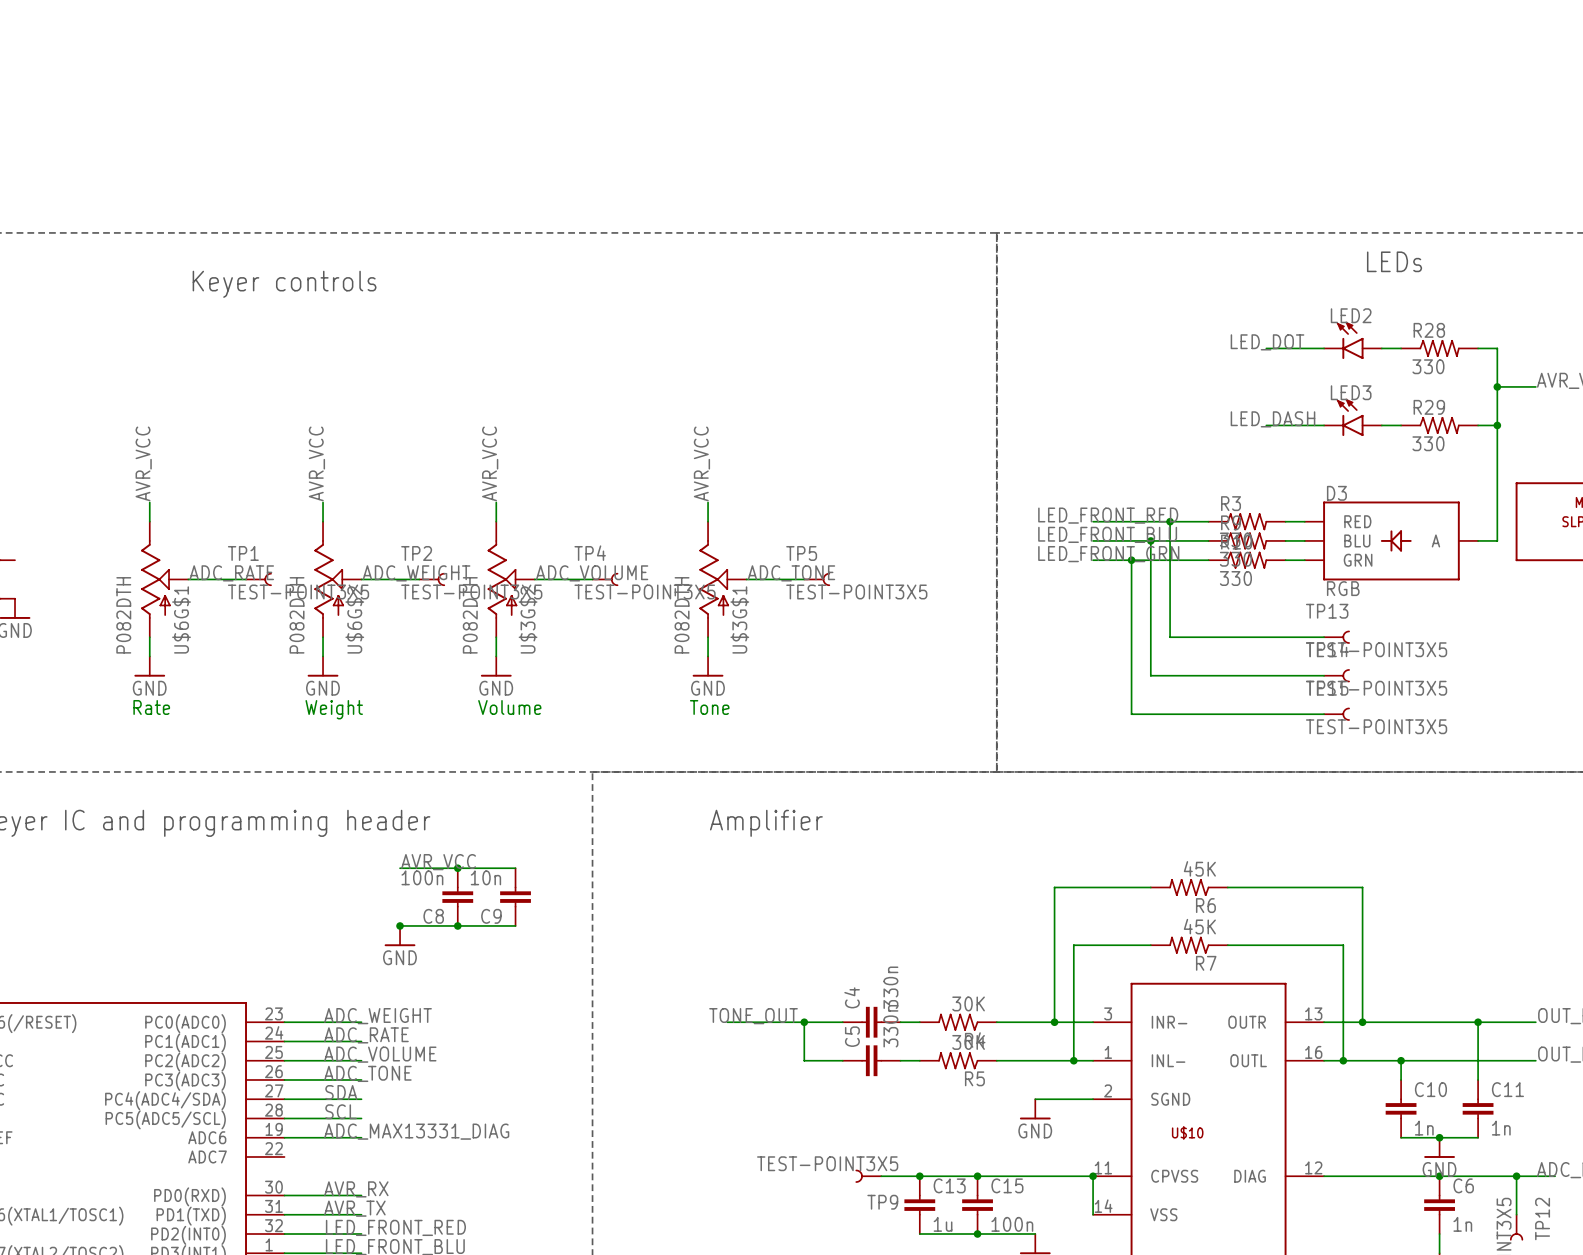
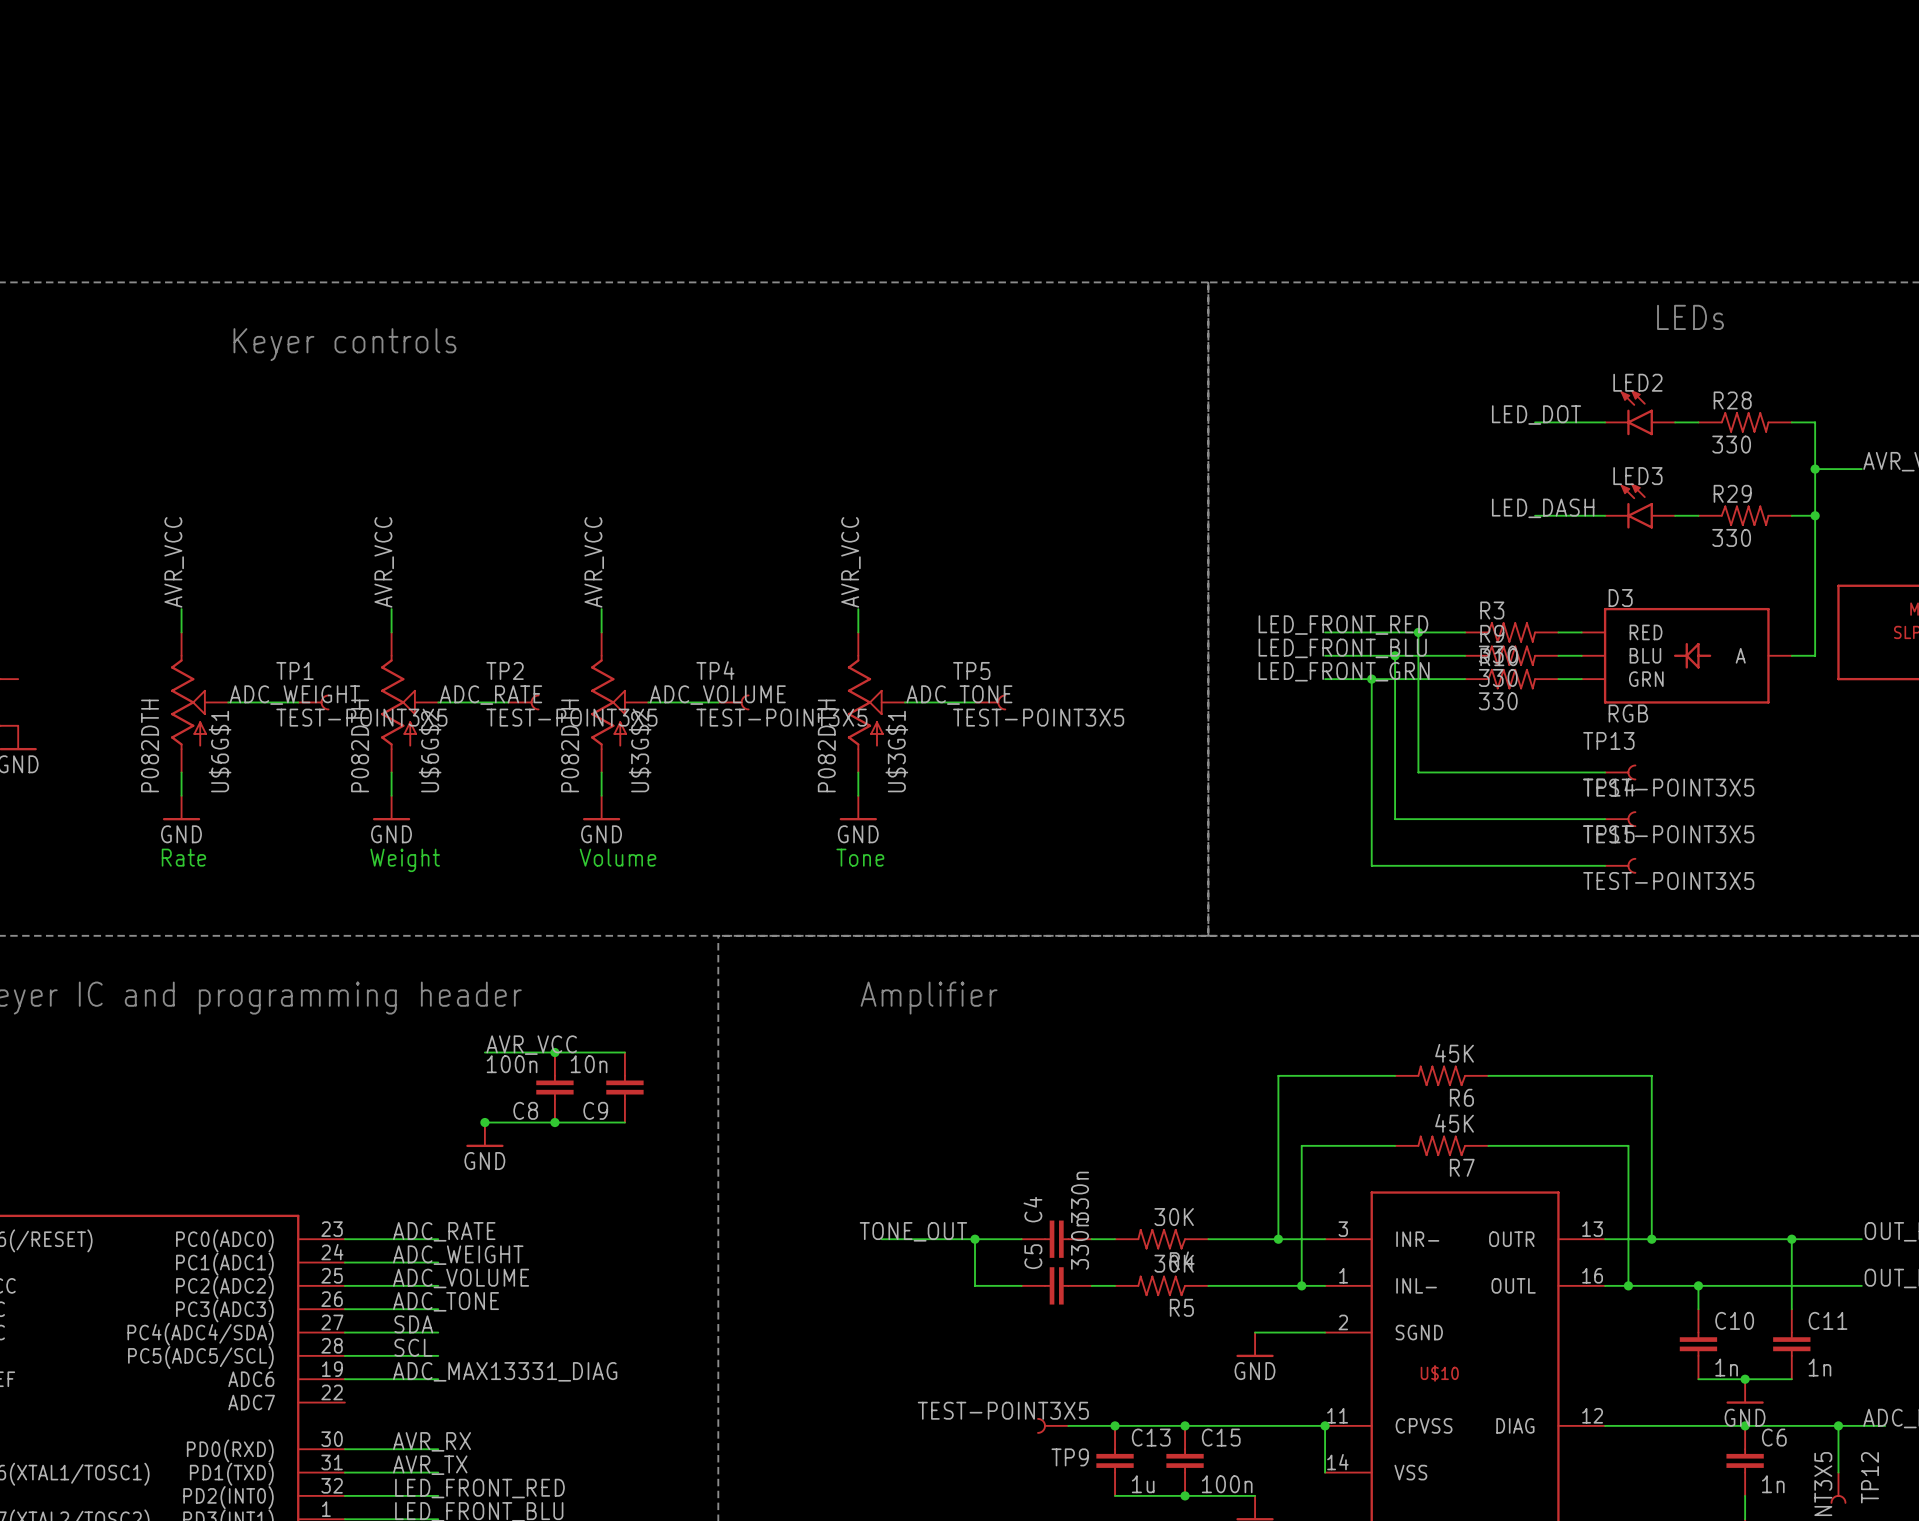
label: ADC_RATE (231, 573) -> ADC_WEIGHT (294, 695)
label: ADC_WEIGHT (416, 573) -> ADC_RATE (490, 695)
label: ADC_WEIGHT (378, 1016) -> ADC_RATE (444, 1231)
label: ADC_RATE (366, 1035) -> ADC_WEIGHT (458, 1255)

